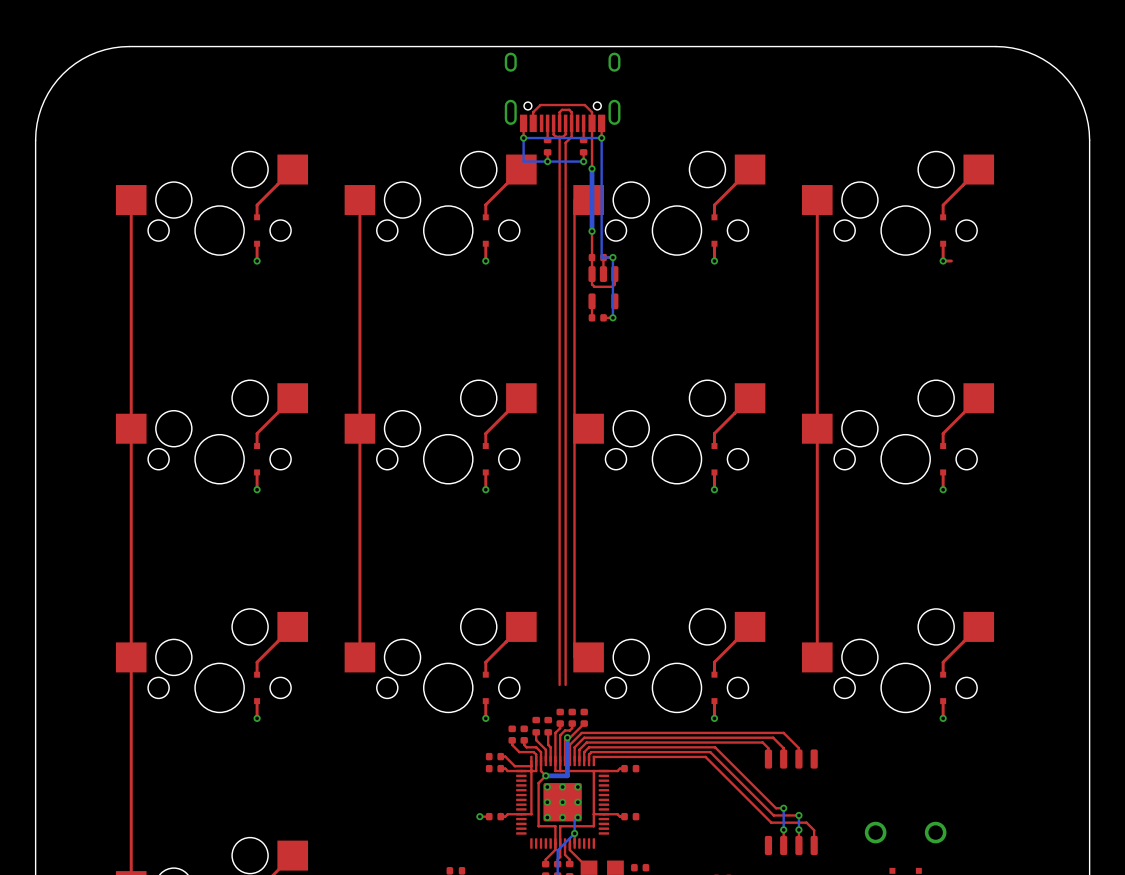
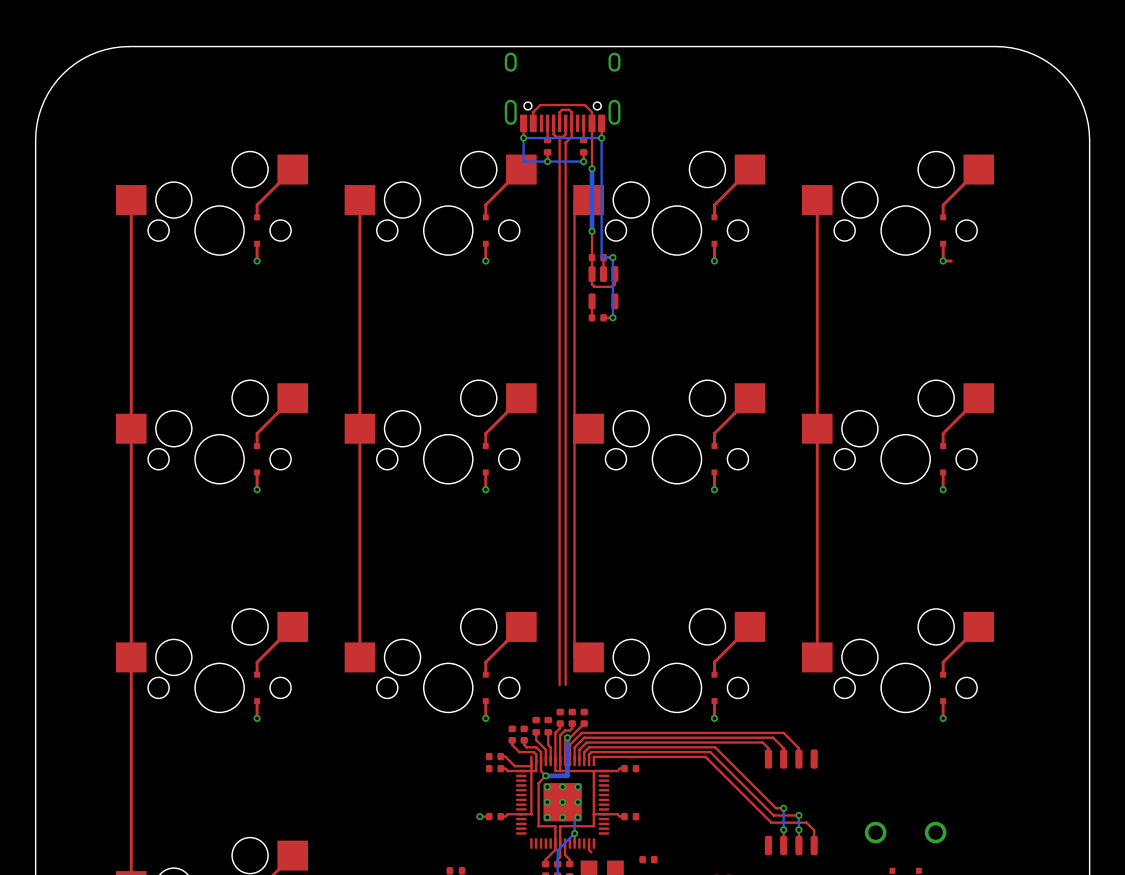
top track: (569, 843) (569, 849) (589, 867) -> none
top track: none -> (589, 843) (589, 849) (591, 852)
part: none -> (648, 859)
part: (640, 867) -> none

